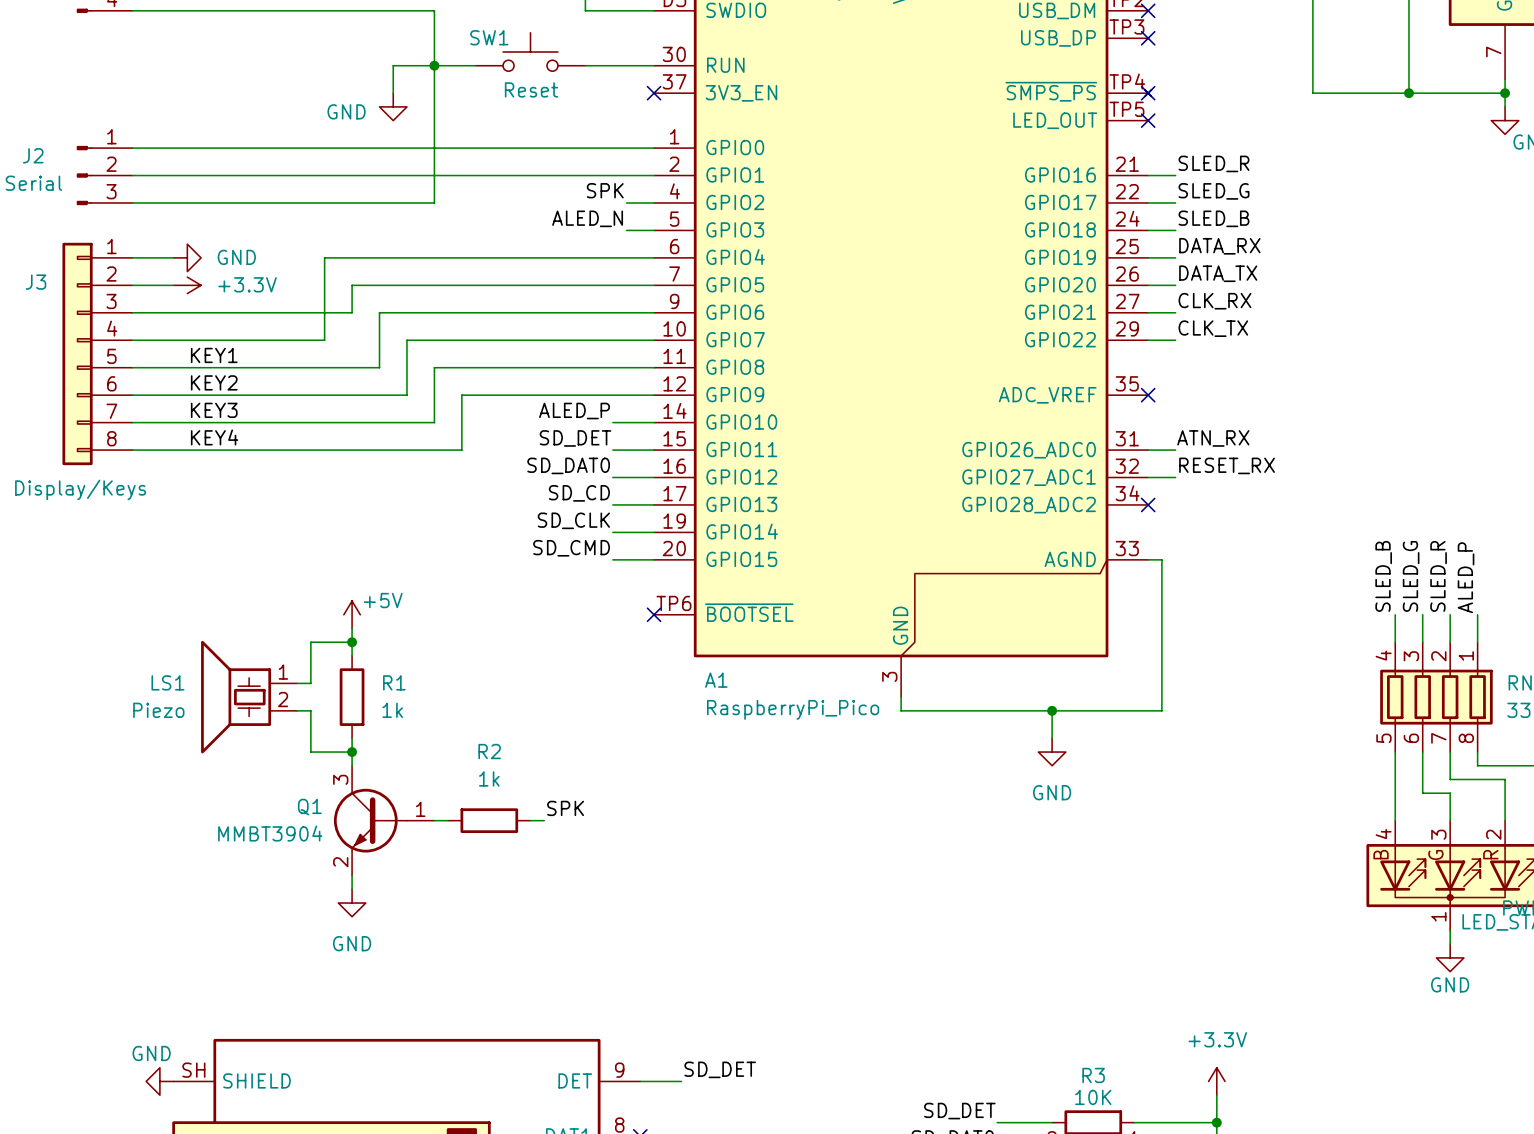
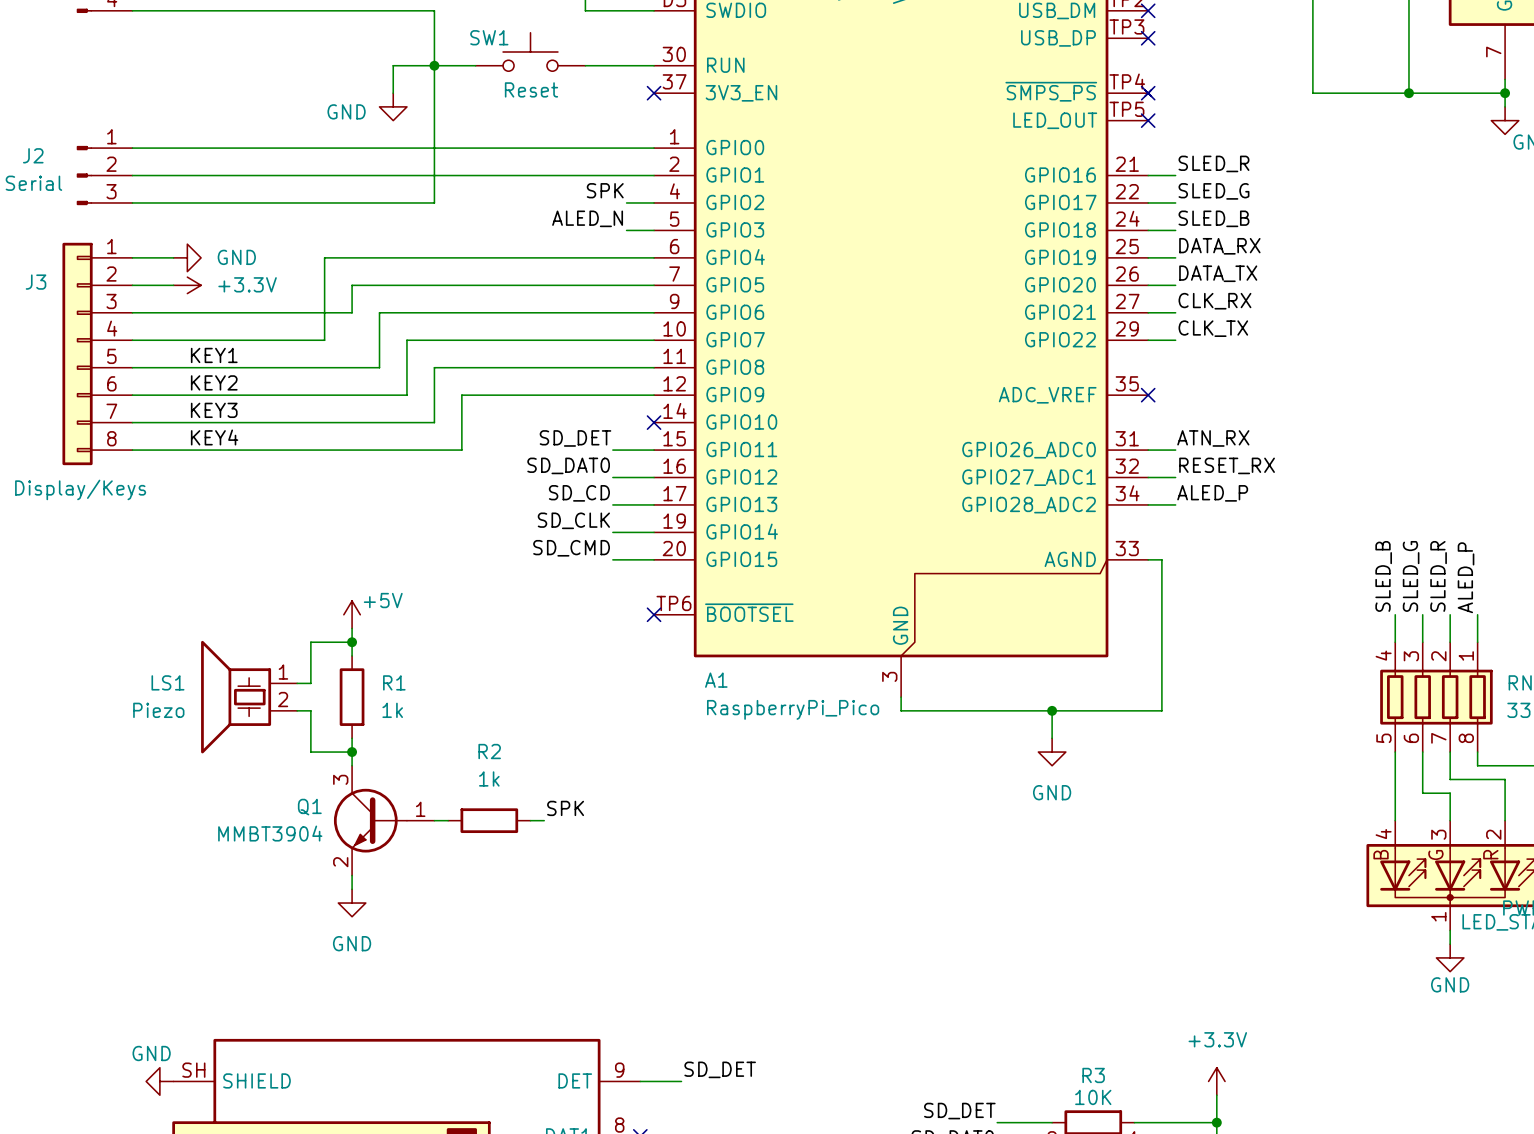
label: ALED_P (574, 411) -> none
wire: (612, 422) (654, 422) -> none
no-connect mark: none -> (654, 422)
label: none -> ALED_P (1212, 493)
wire: none -> (1148, 504) (1175, 504)
no-connect mark: (1148, 504) -> none

